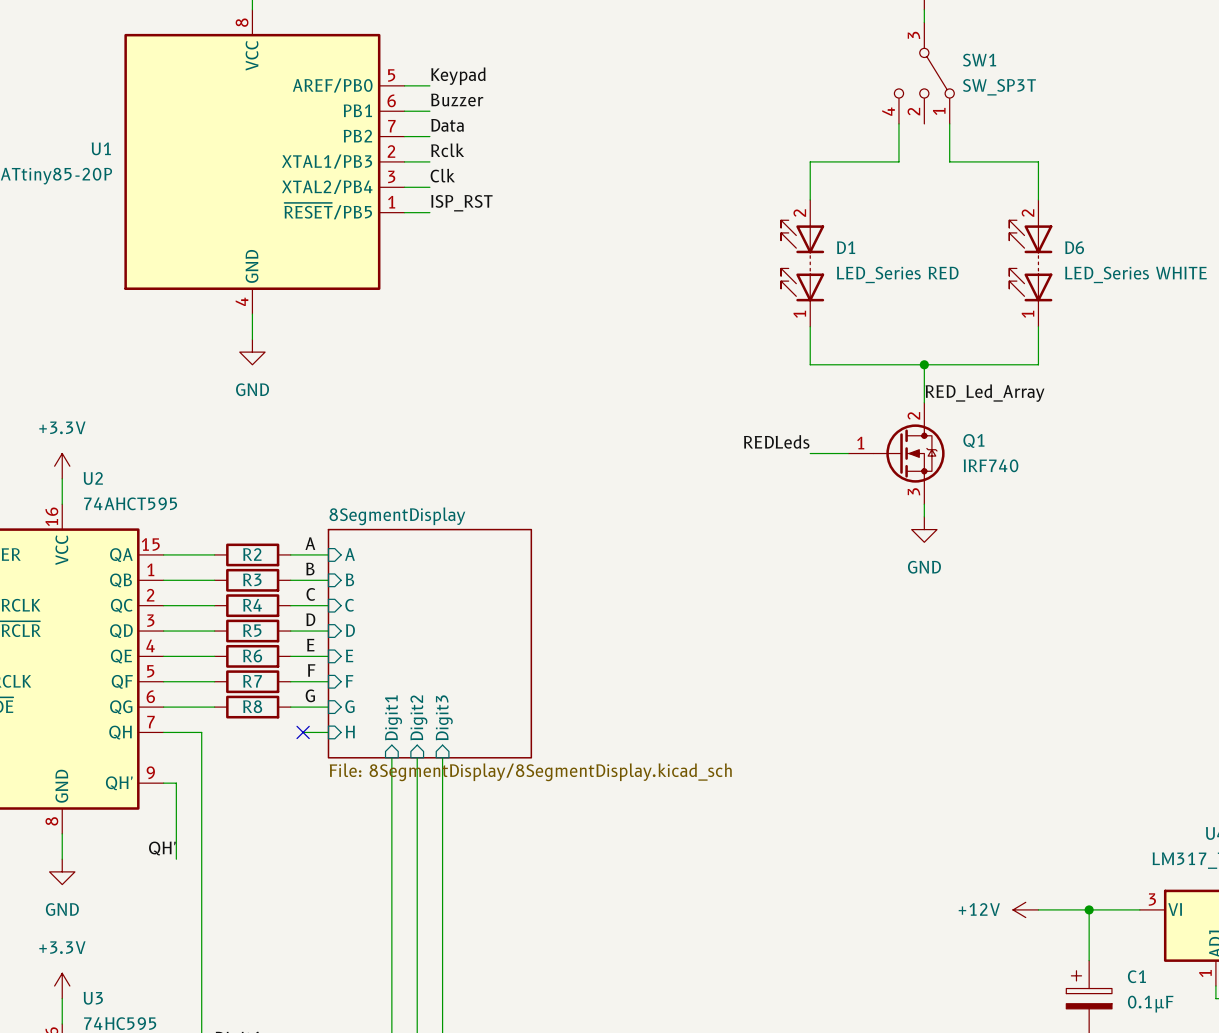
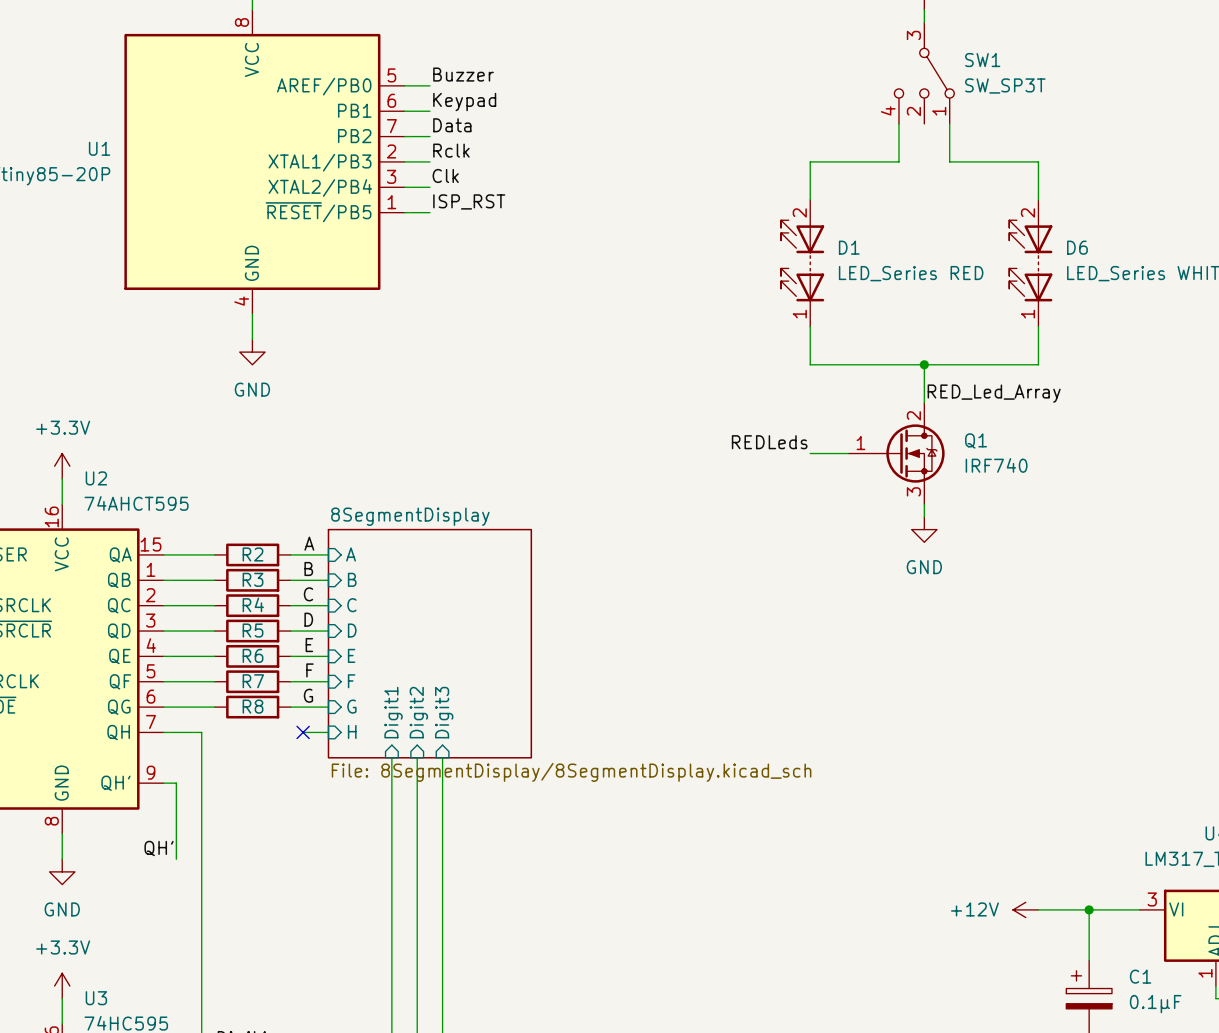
label: Keypad (458, 76) -> Buzzer (463, 74)
label: Buzzer (457, 100) -> Keypad (464, 102)

